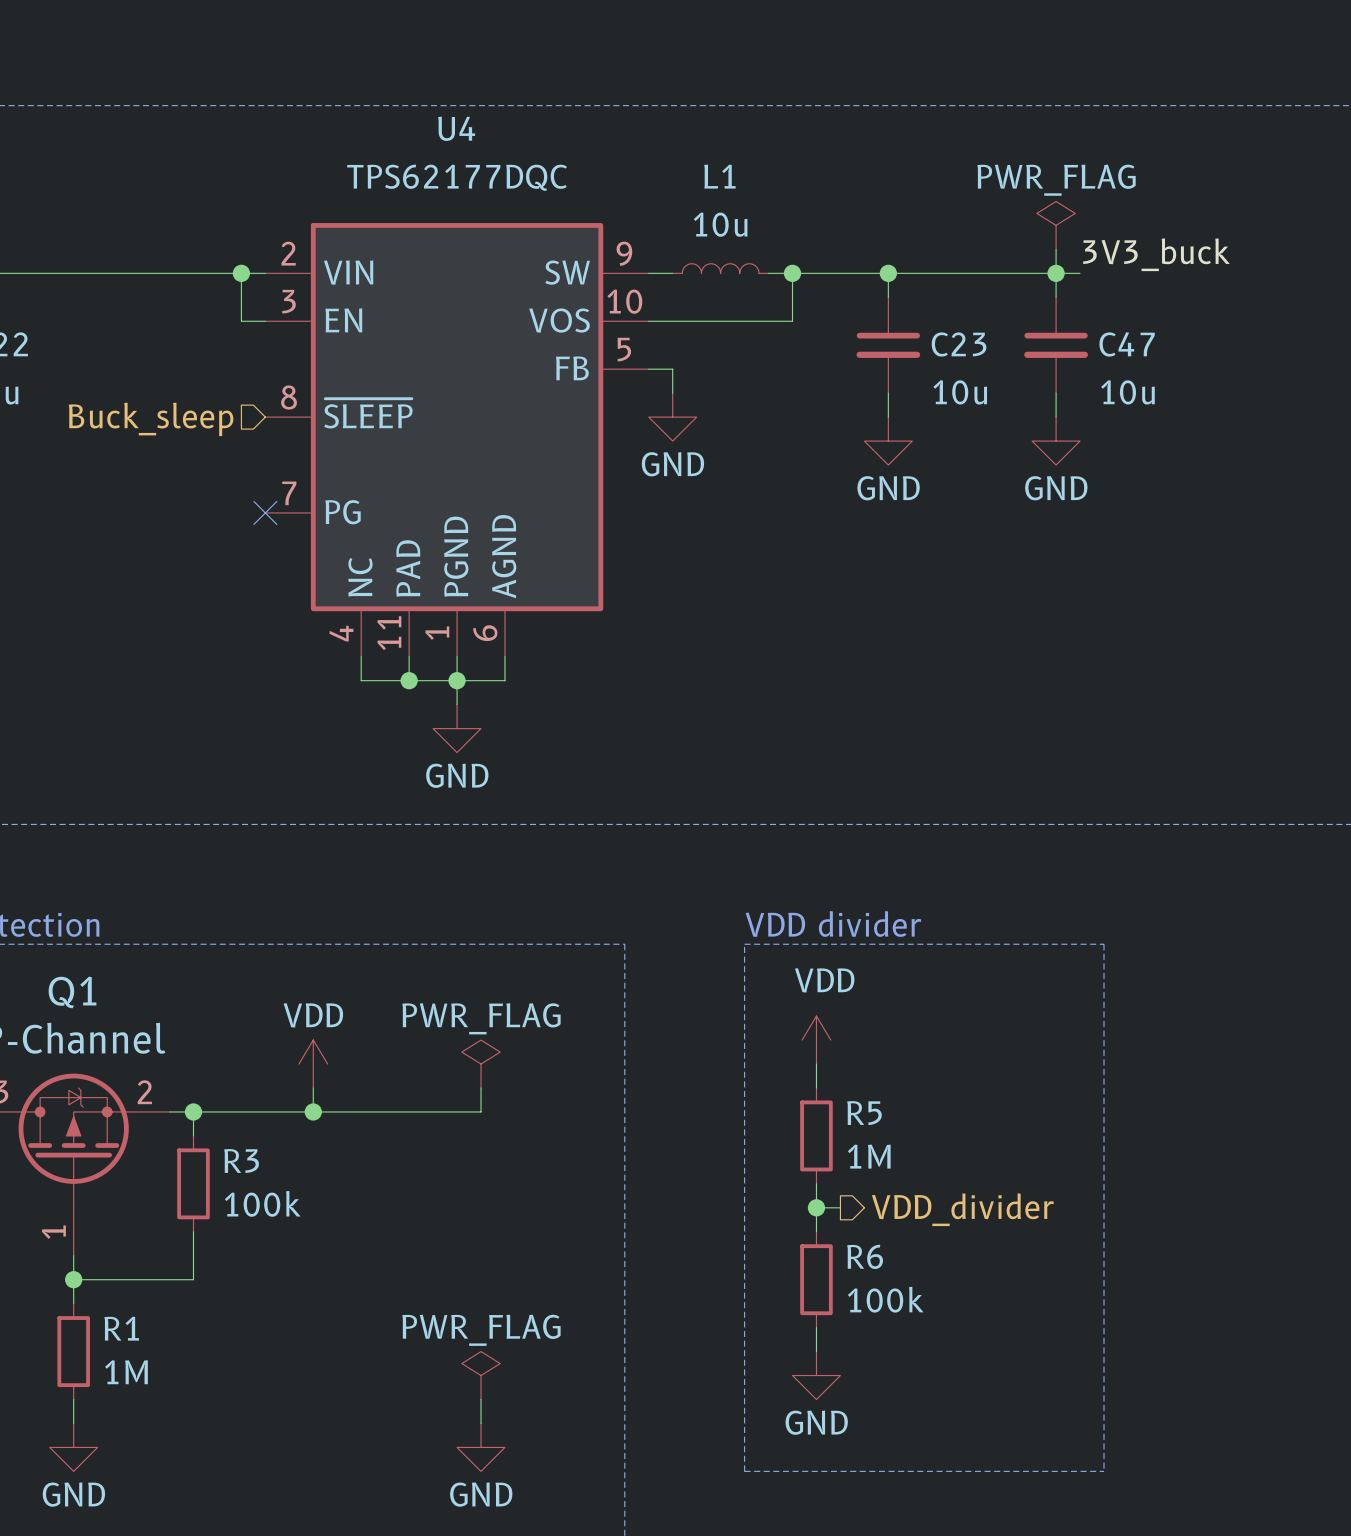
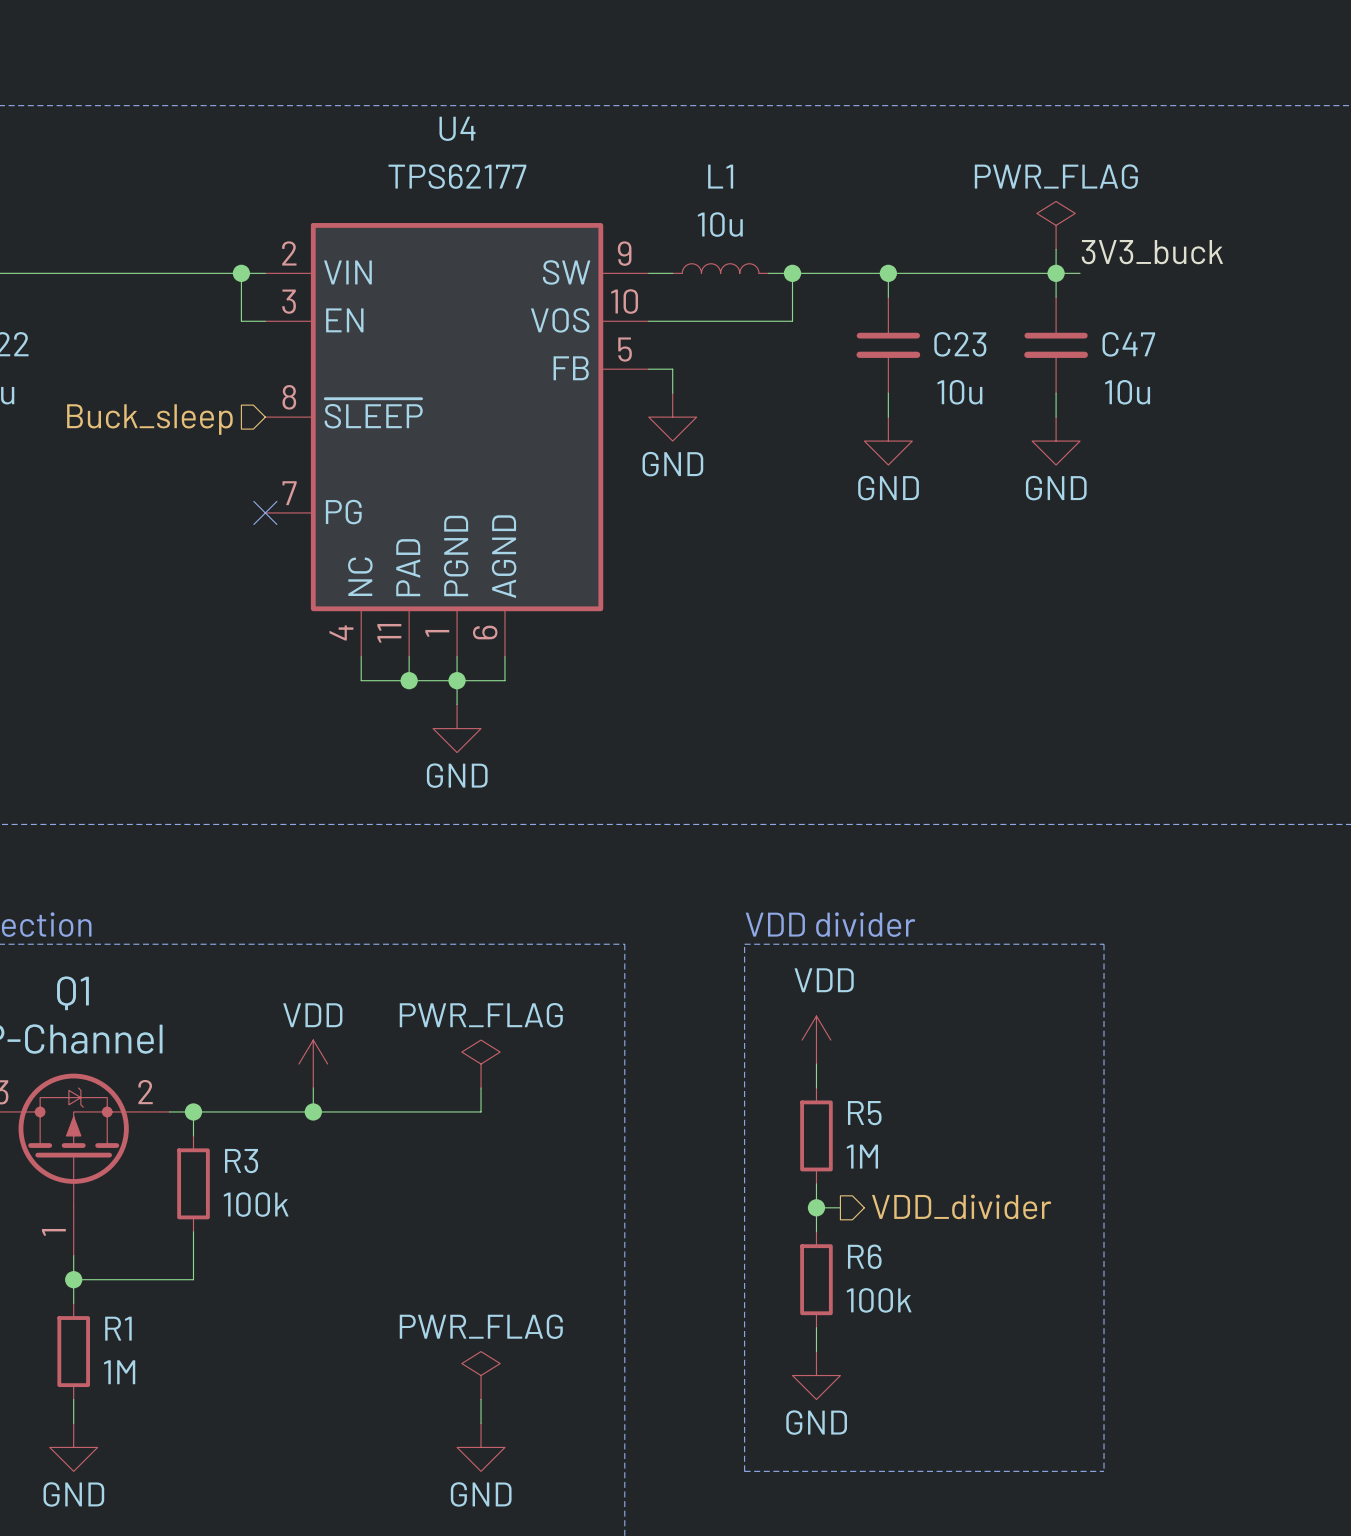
U4 value: TPS62177DQC (457, 177) -> TPS62177 (457, 176)

